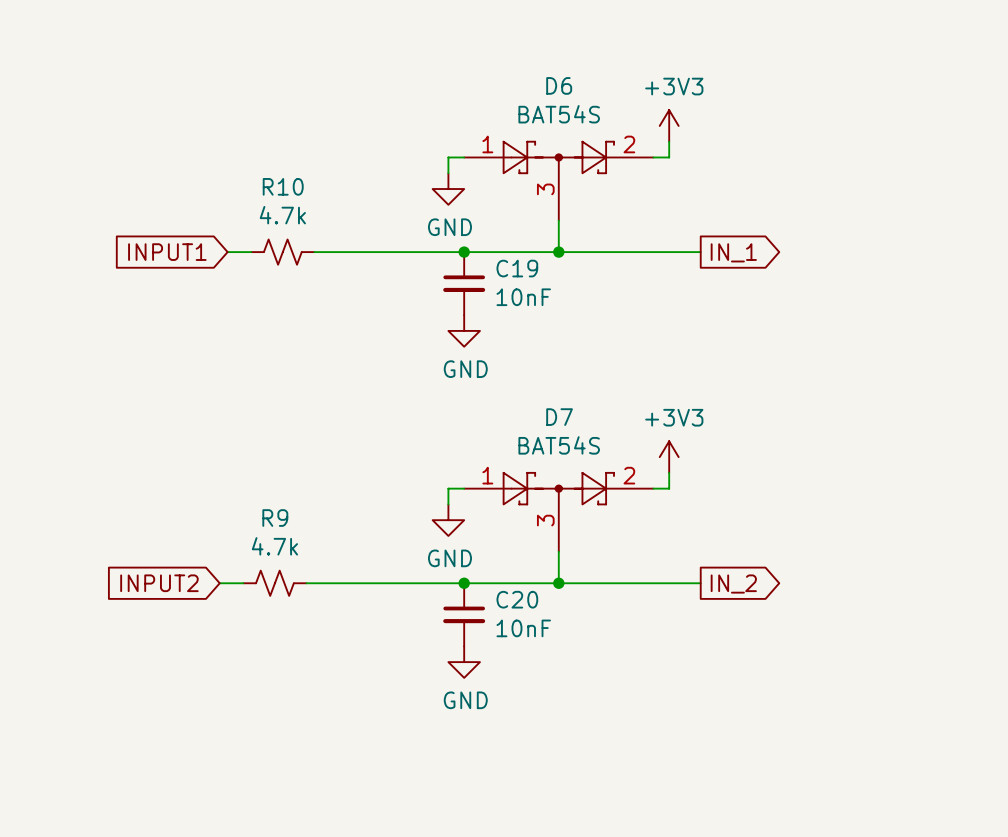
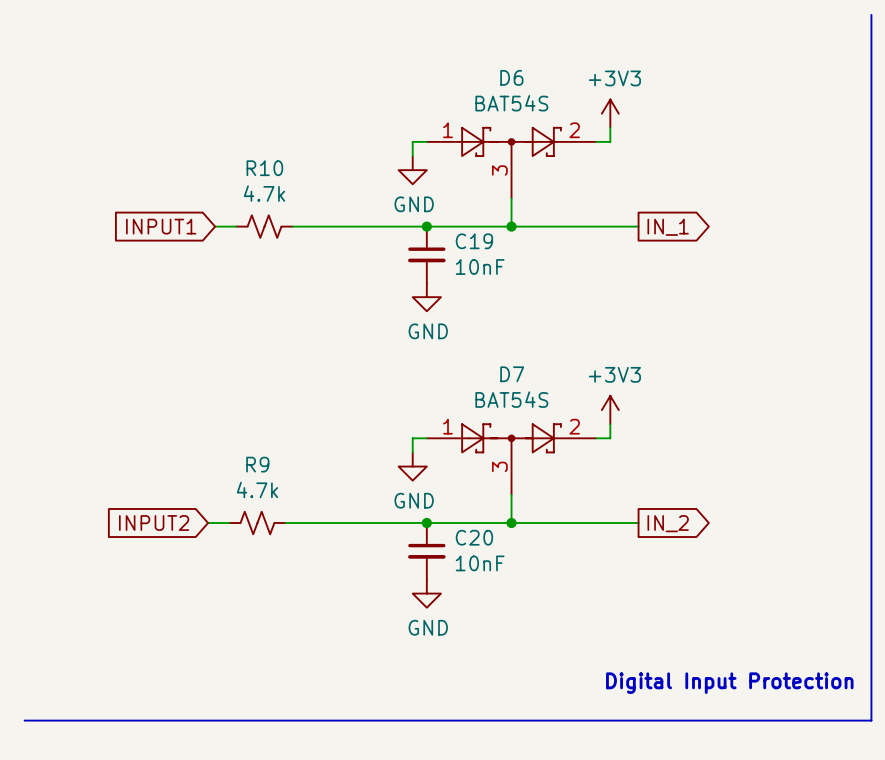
line: none -> (871, 14) (871, 720) (24, 720)
text: none -> Digital Input Protection (729, 683)

